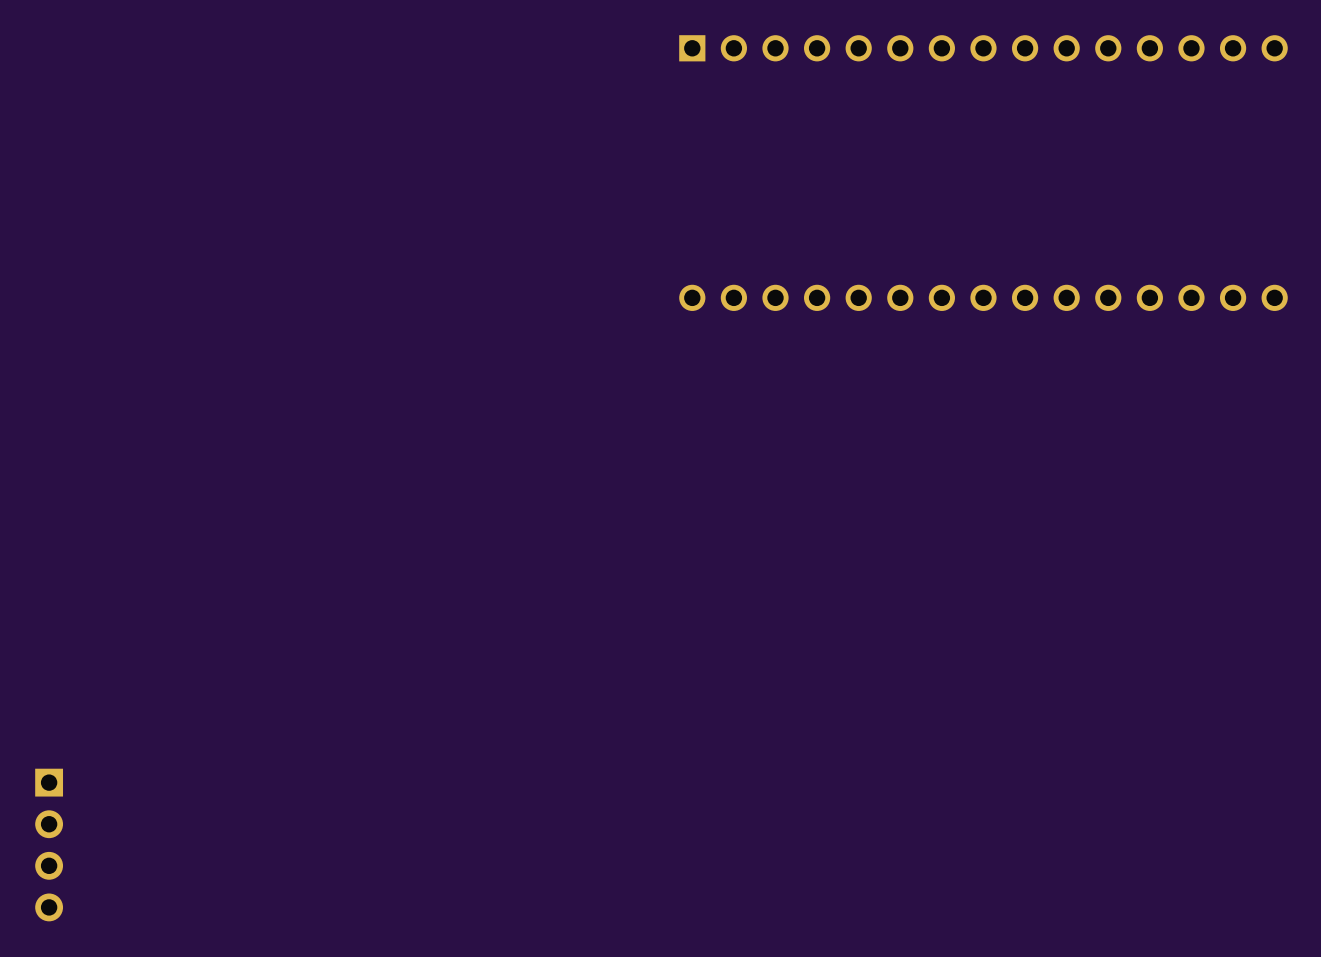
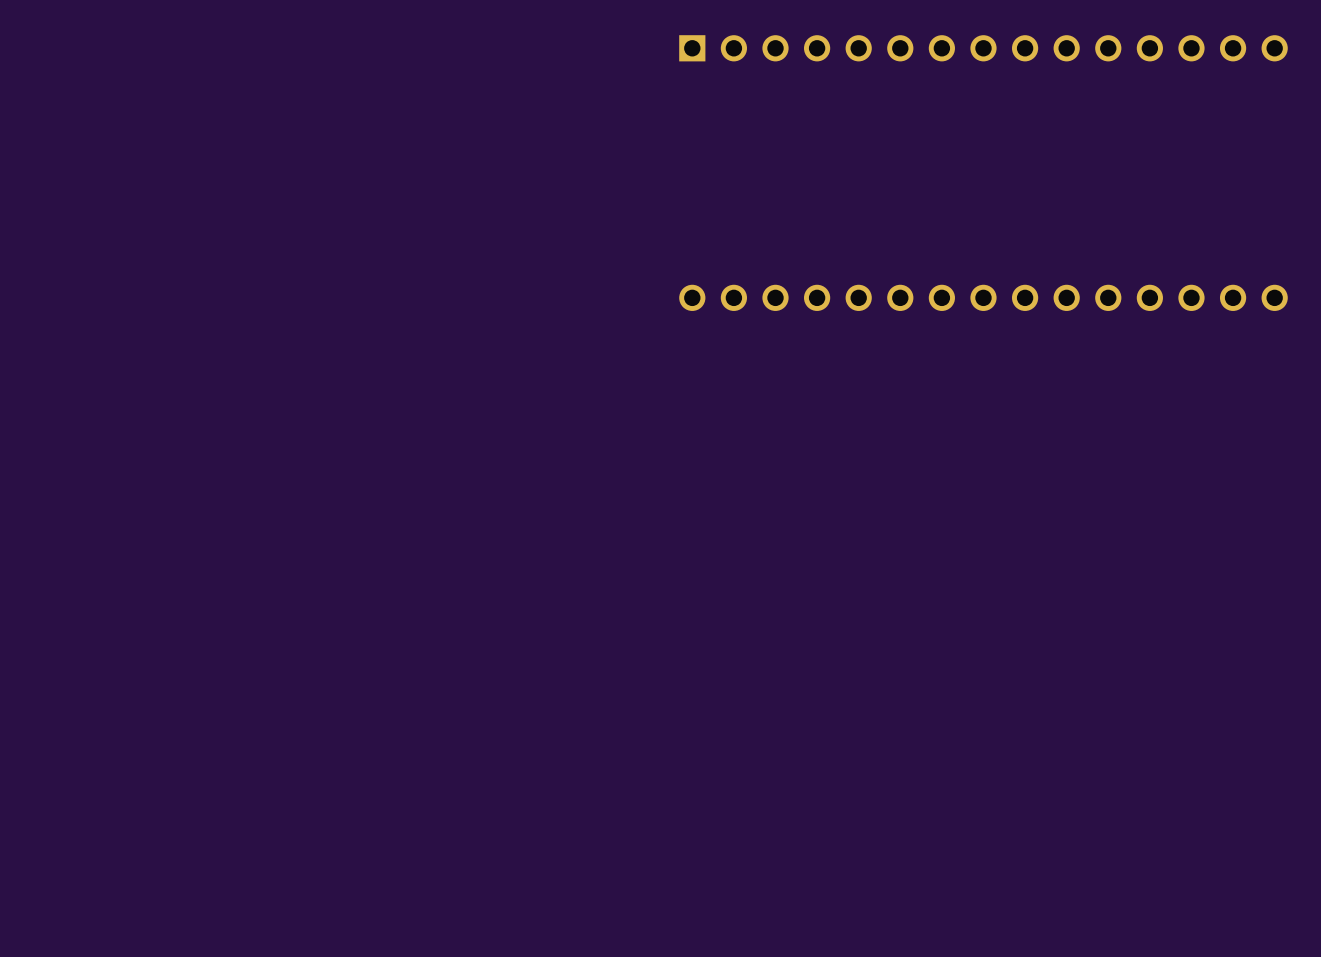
part: (49, 845) -> none

